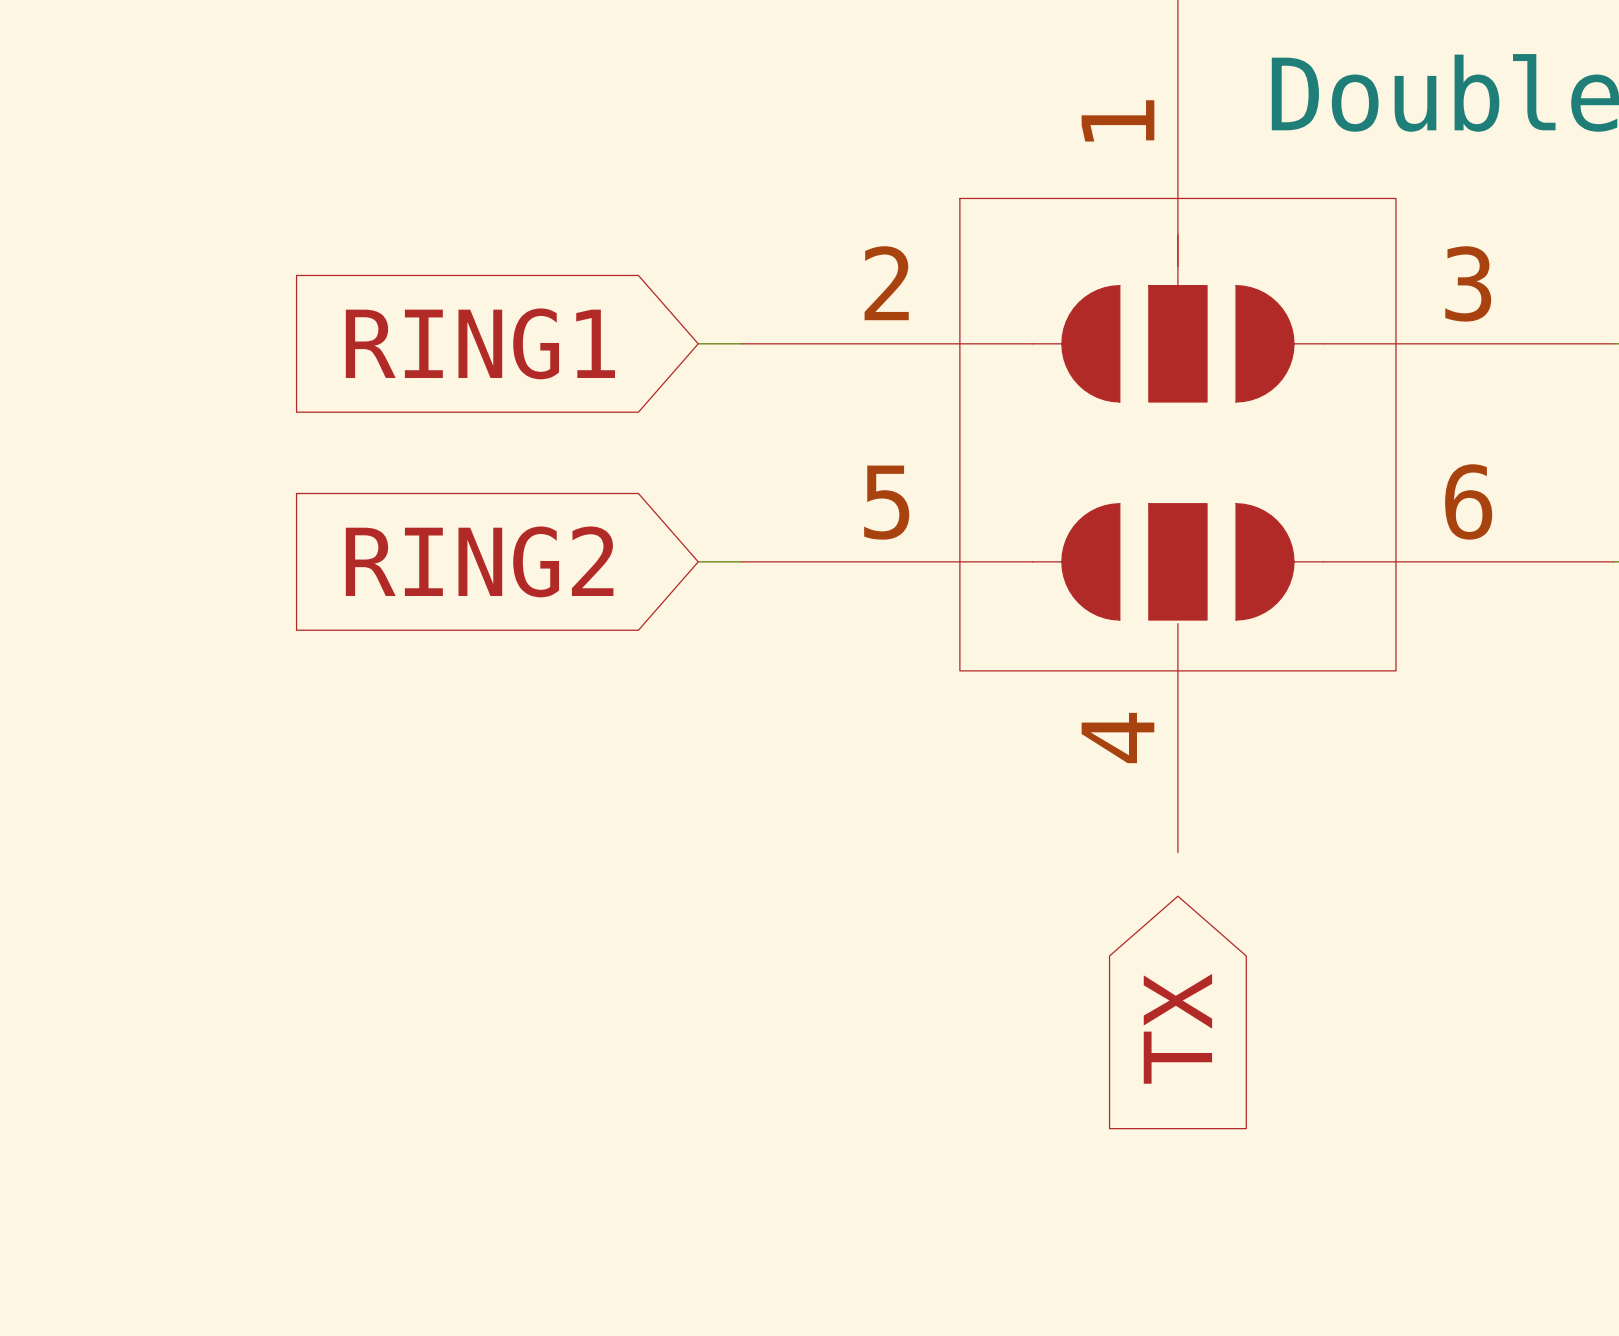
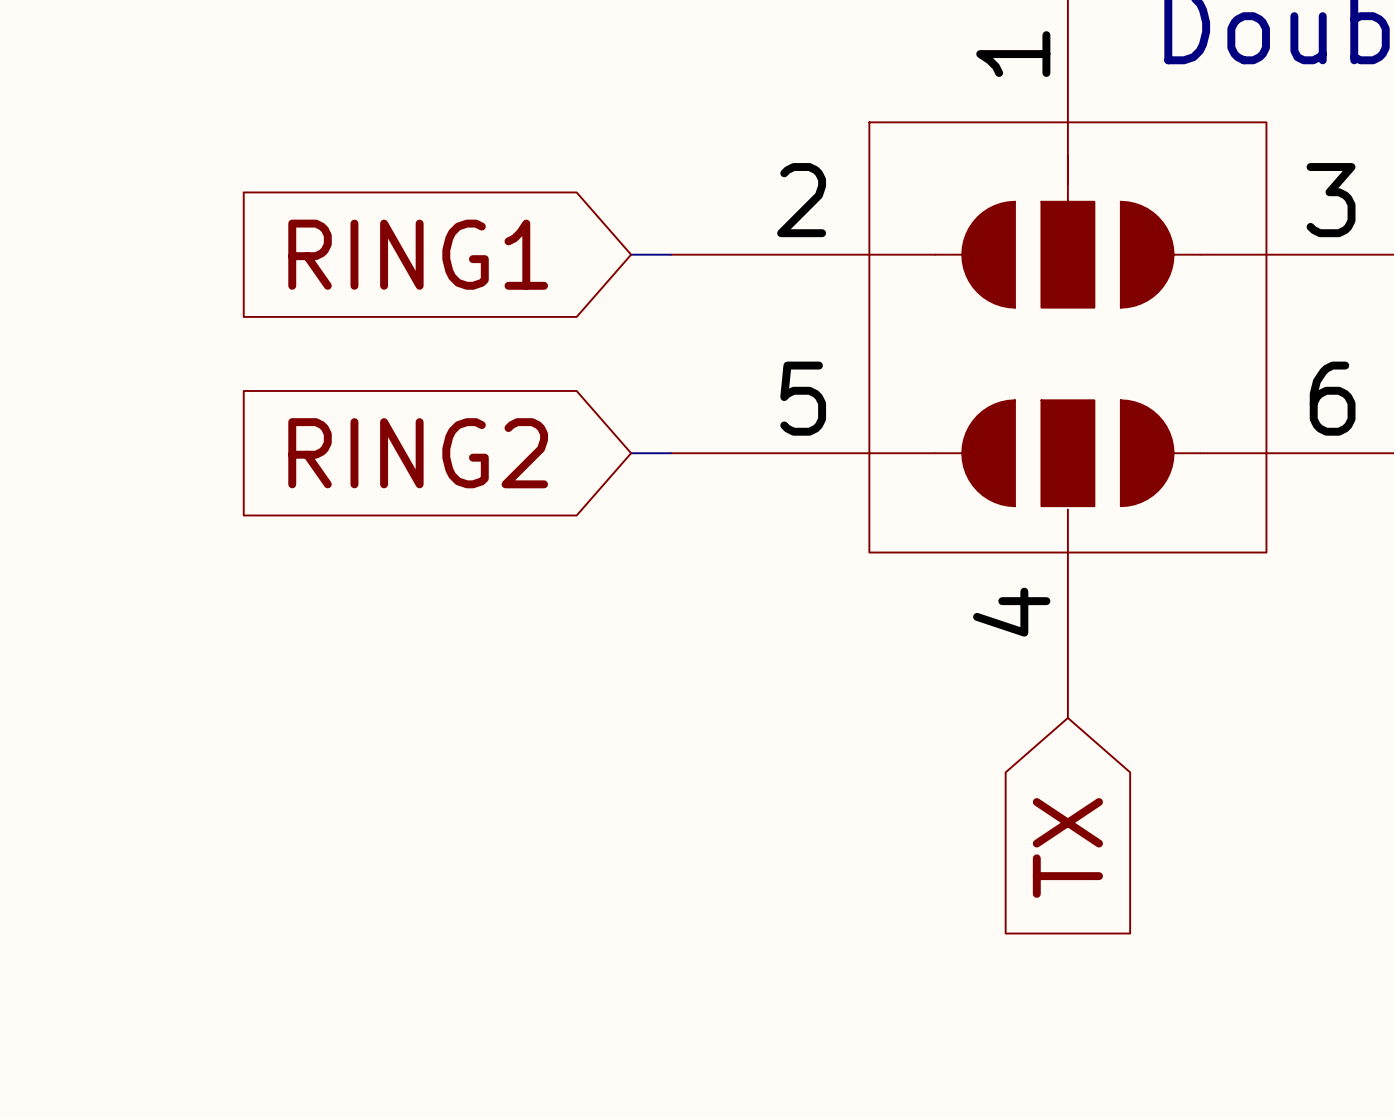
global label position: TX (1177, 1028) -> TX (1067, 847)

